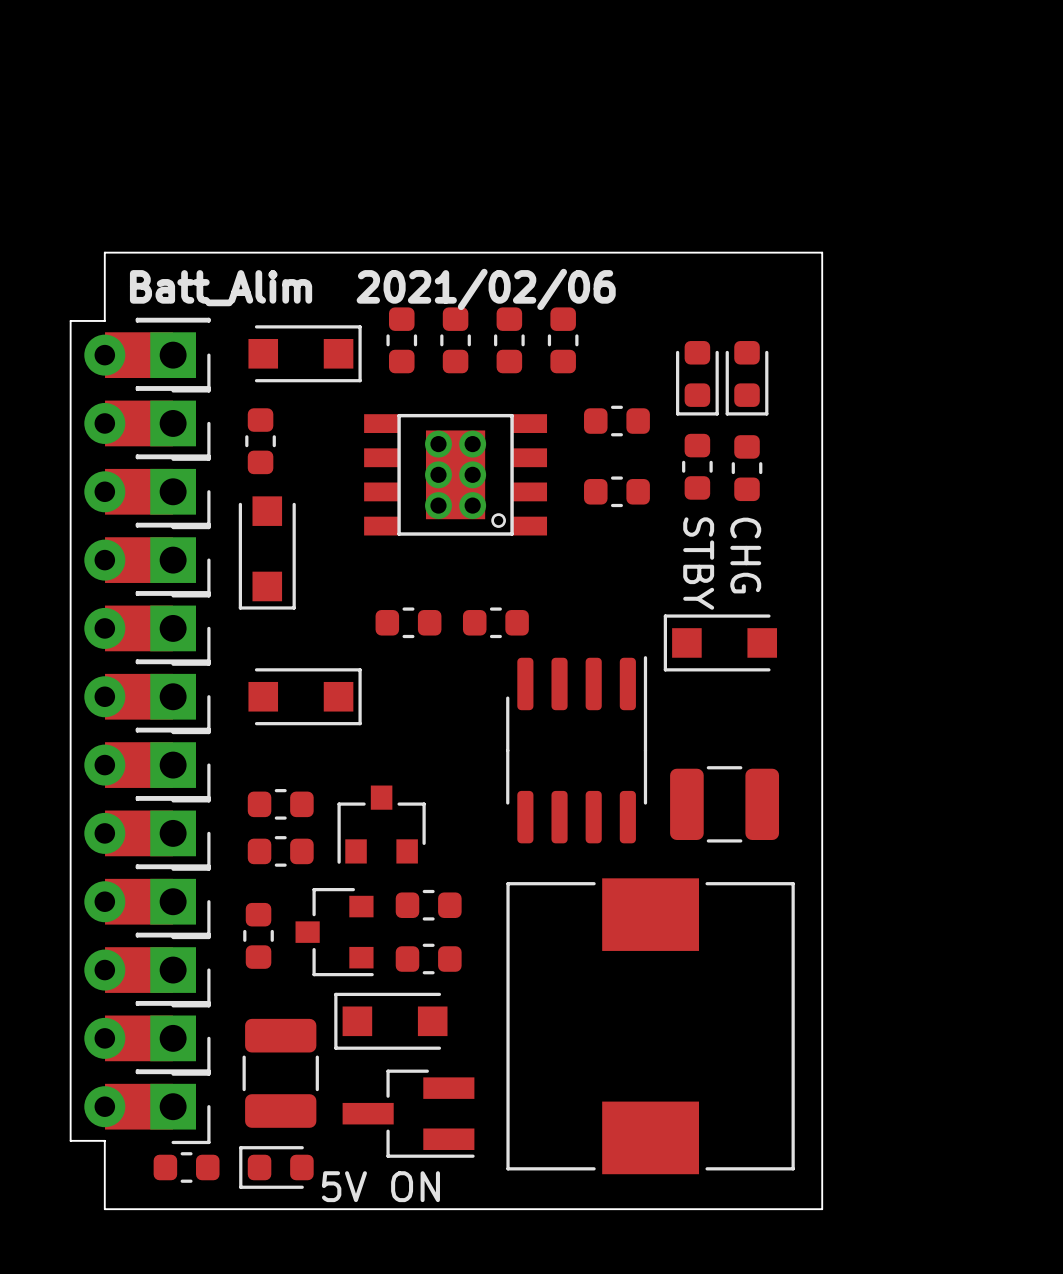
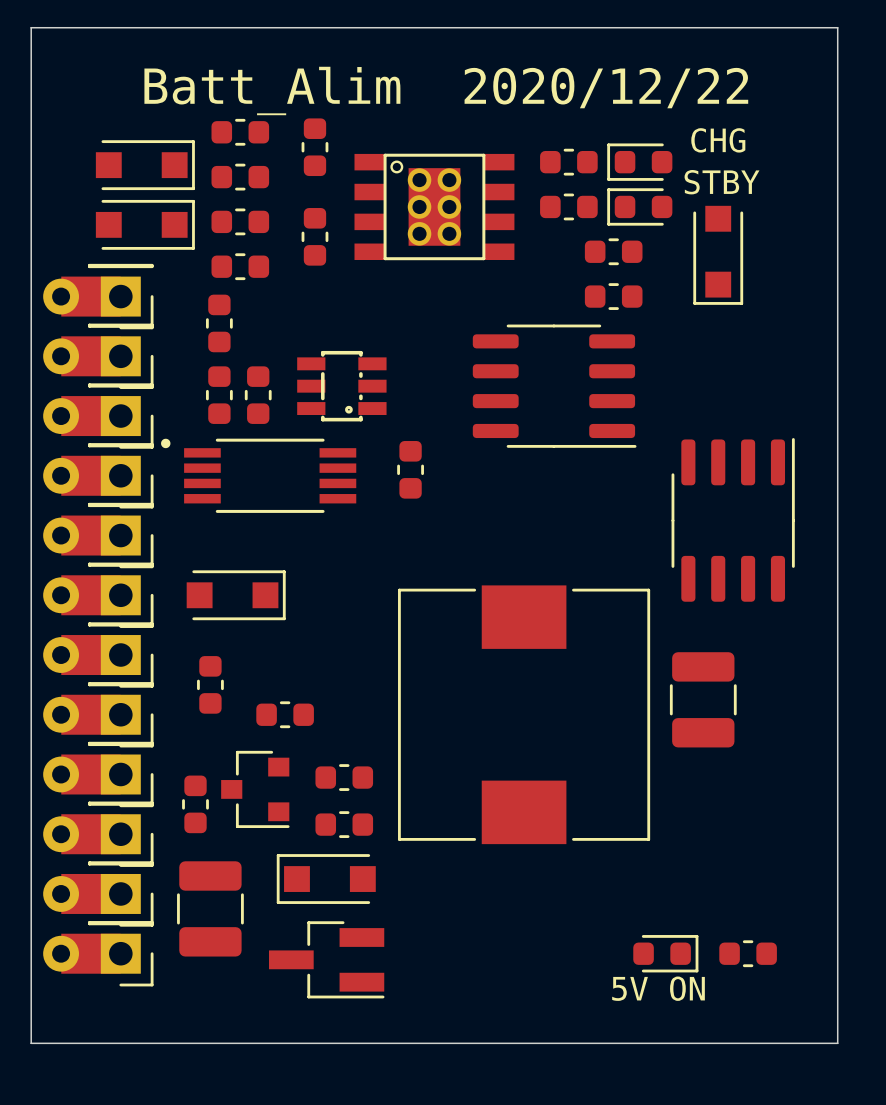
text: none -> Batt_Alim 2020/12/22 (446, 90)
part: none -> (240, 132)
part: none -> (314, 147)
part: none -> (568, 162)
part: none -> (639, 162)
part: none -> (145, 165)
part: none -> (240, 177)
part: none -> (568, 206)
part: none -> (639, 206)
part: none -> (240, 221)
part: none -> (145, 224)
part: none -> (314, 236)
text: Batt_Alim 2021/02/06 (372, 289) -> none
part: none -> (613, 251)
part: none -> (718, 255)
board edge: (70, 320) (104, 320) (104, 252) (822, 252) (822, 1209) -> (31, 266) (31, 27) (837, 27) (837, 1043) (688, 1043)
part: none -> (240, 266)
part: (401, 340) -> none
part: (455, 340) -> none
part: (509, 340) -> none
part: (563, 340) -> none
part: (305, 353) -> none
part: none -> (613, 296)
part: (697, 378) -> none
part: (747, 378) -> none
part: none -> (219, 323)
part: (616, 421) -> none
part: (260, 441) -> none
part: none -> (341, 386)
part: none -> (554, 386)
part: (697, 466) -> none
part: none -> (219, 395)
part: none -> (258, 395)
part: (747, 468) -> none
part rotation: 0° (455, 474) -> 180° (434, 206)
part position: (455, 474) -> (434, 206)
part: (616, 491) -> none
part: (267, 552) -> none
part: none -> (410, 469)
text rotation: 0° (745, 555) -> 90° counterclockwise (718, 140)
text position: CHG (745, 555) -> CHG (718, 140)
part: none -> (258, 475)
text rotation: 0° (698, 563) -> 90° counterclockwise (722, 182)
text position: STBY (698, 563) -> STBY (722, 182)
part: none -> (733, 519)
part: (408, 622) -> none
part: (495, 622) -> none
part: (720, 642) -> none
part: (576, 749) -> none
part footprint: [337, 785, 426, 864] -> [256, 701, 314, 729]
part rotation: 0° (280, 804) -> 90° clockwise (210, 684)
part rotation: 0° (724, 804) -> 90° clockwise (703, 699)
part position: (724, 804) -> (703, 699)
part: (280, 851) -> none
part position: (334, 932) -> (255, 789)
part position: (390, 1021) -> (326, 879)
part position: (650, 1026) -> (524, 714)
part position: (280, 1073) -> (210, 908)
part: none -> (665, 953)
part: none -> (748, 953)
board edge: (70, 1140) (104, 1140) (104, 1209) -> (31, 983) (31, 1043) (61, 1043)
part: (186, 1167) -> none
part: (276, 1167) -> none
text position: 5V ON (380, 1186) -> 5V ON (658, 988)

